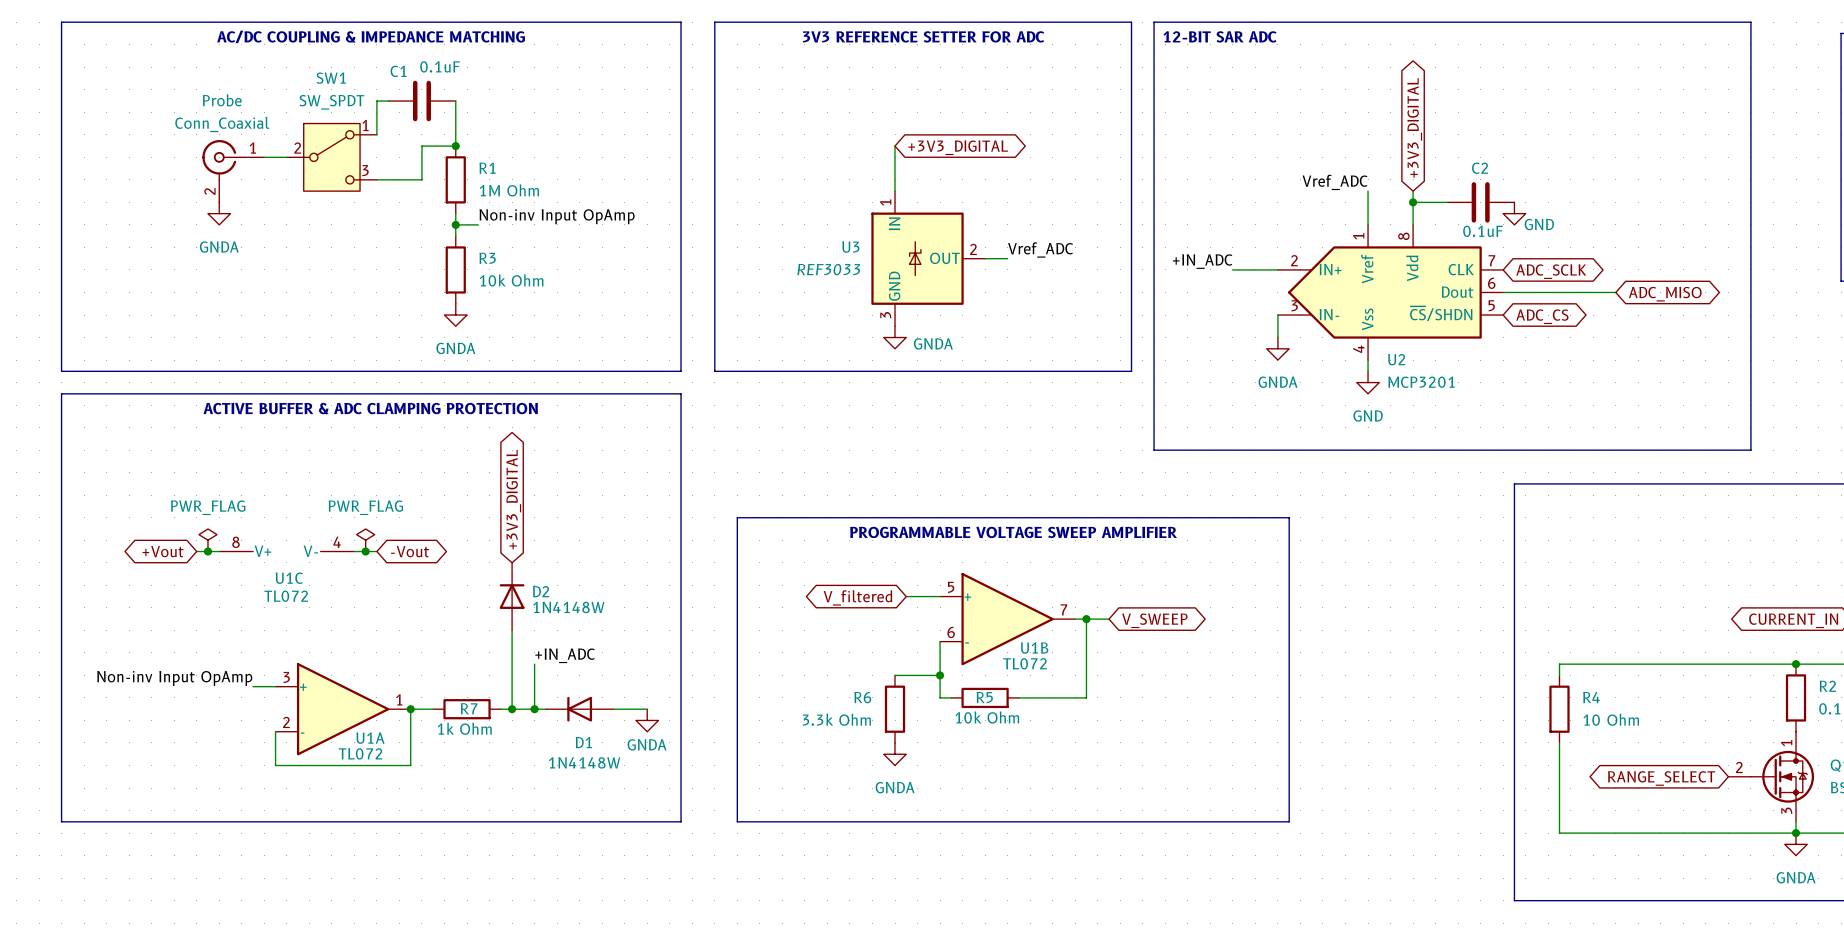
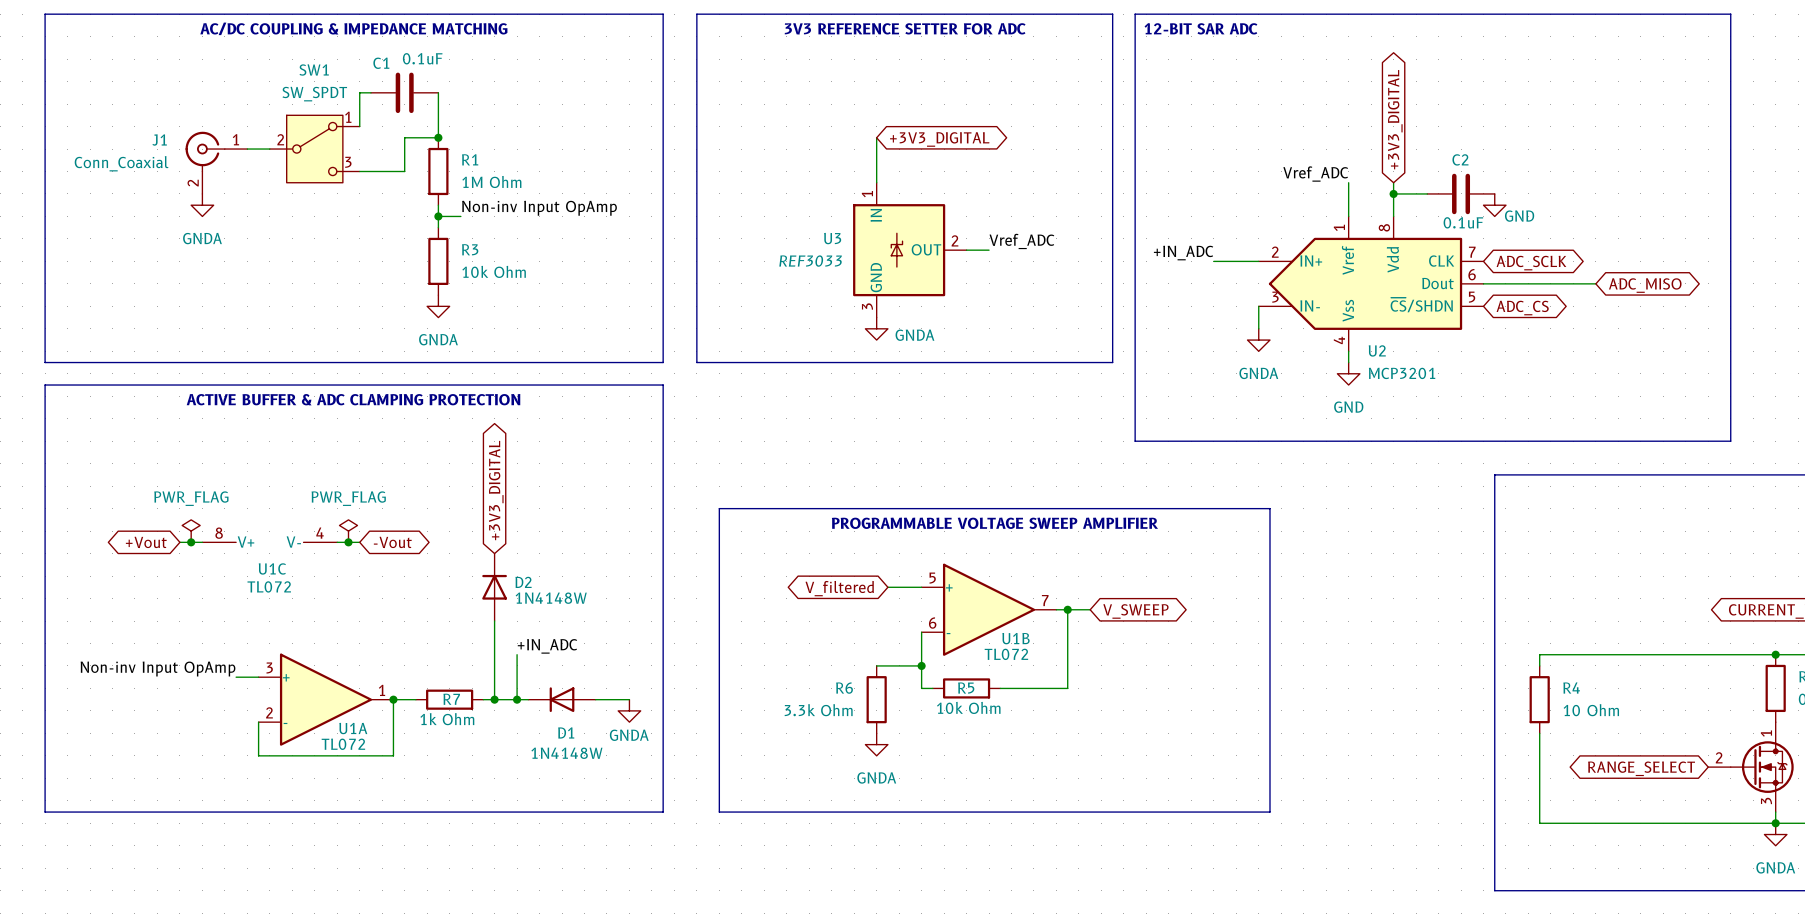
Probe name: Probe (222, 100) -> J1 (159, 140)
Probe value position: Conn_Coaxial (222, 124) -> Conn_Coaxial (121, 163)

